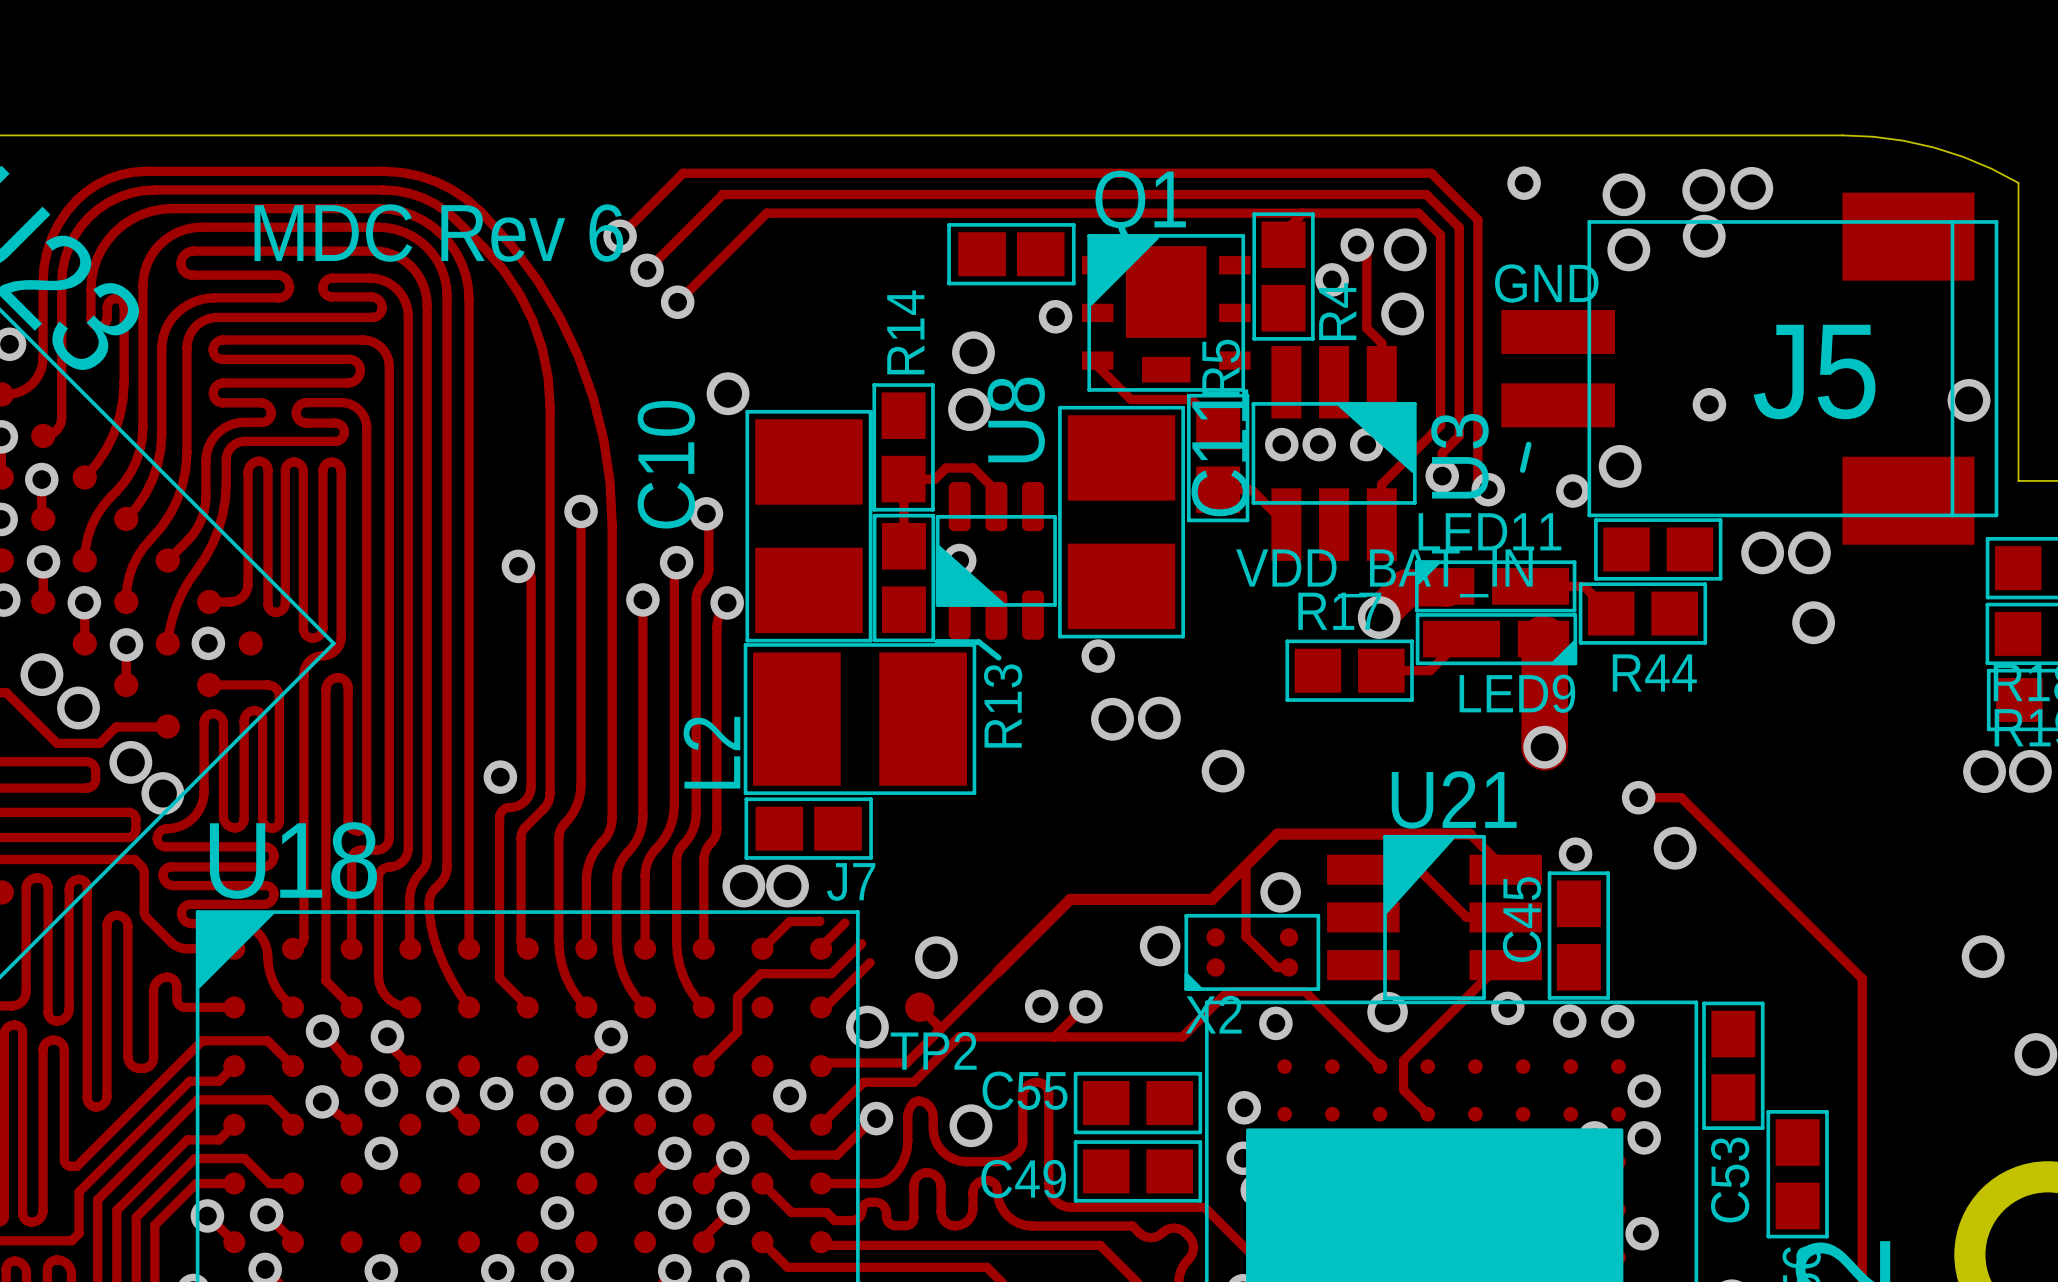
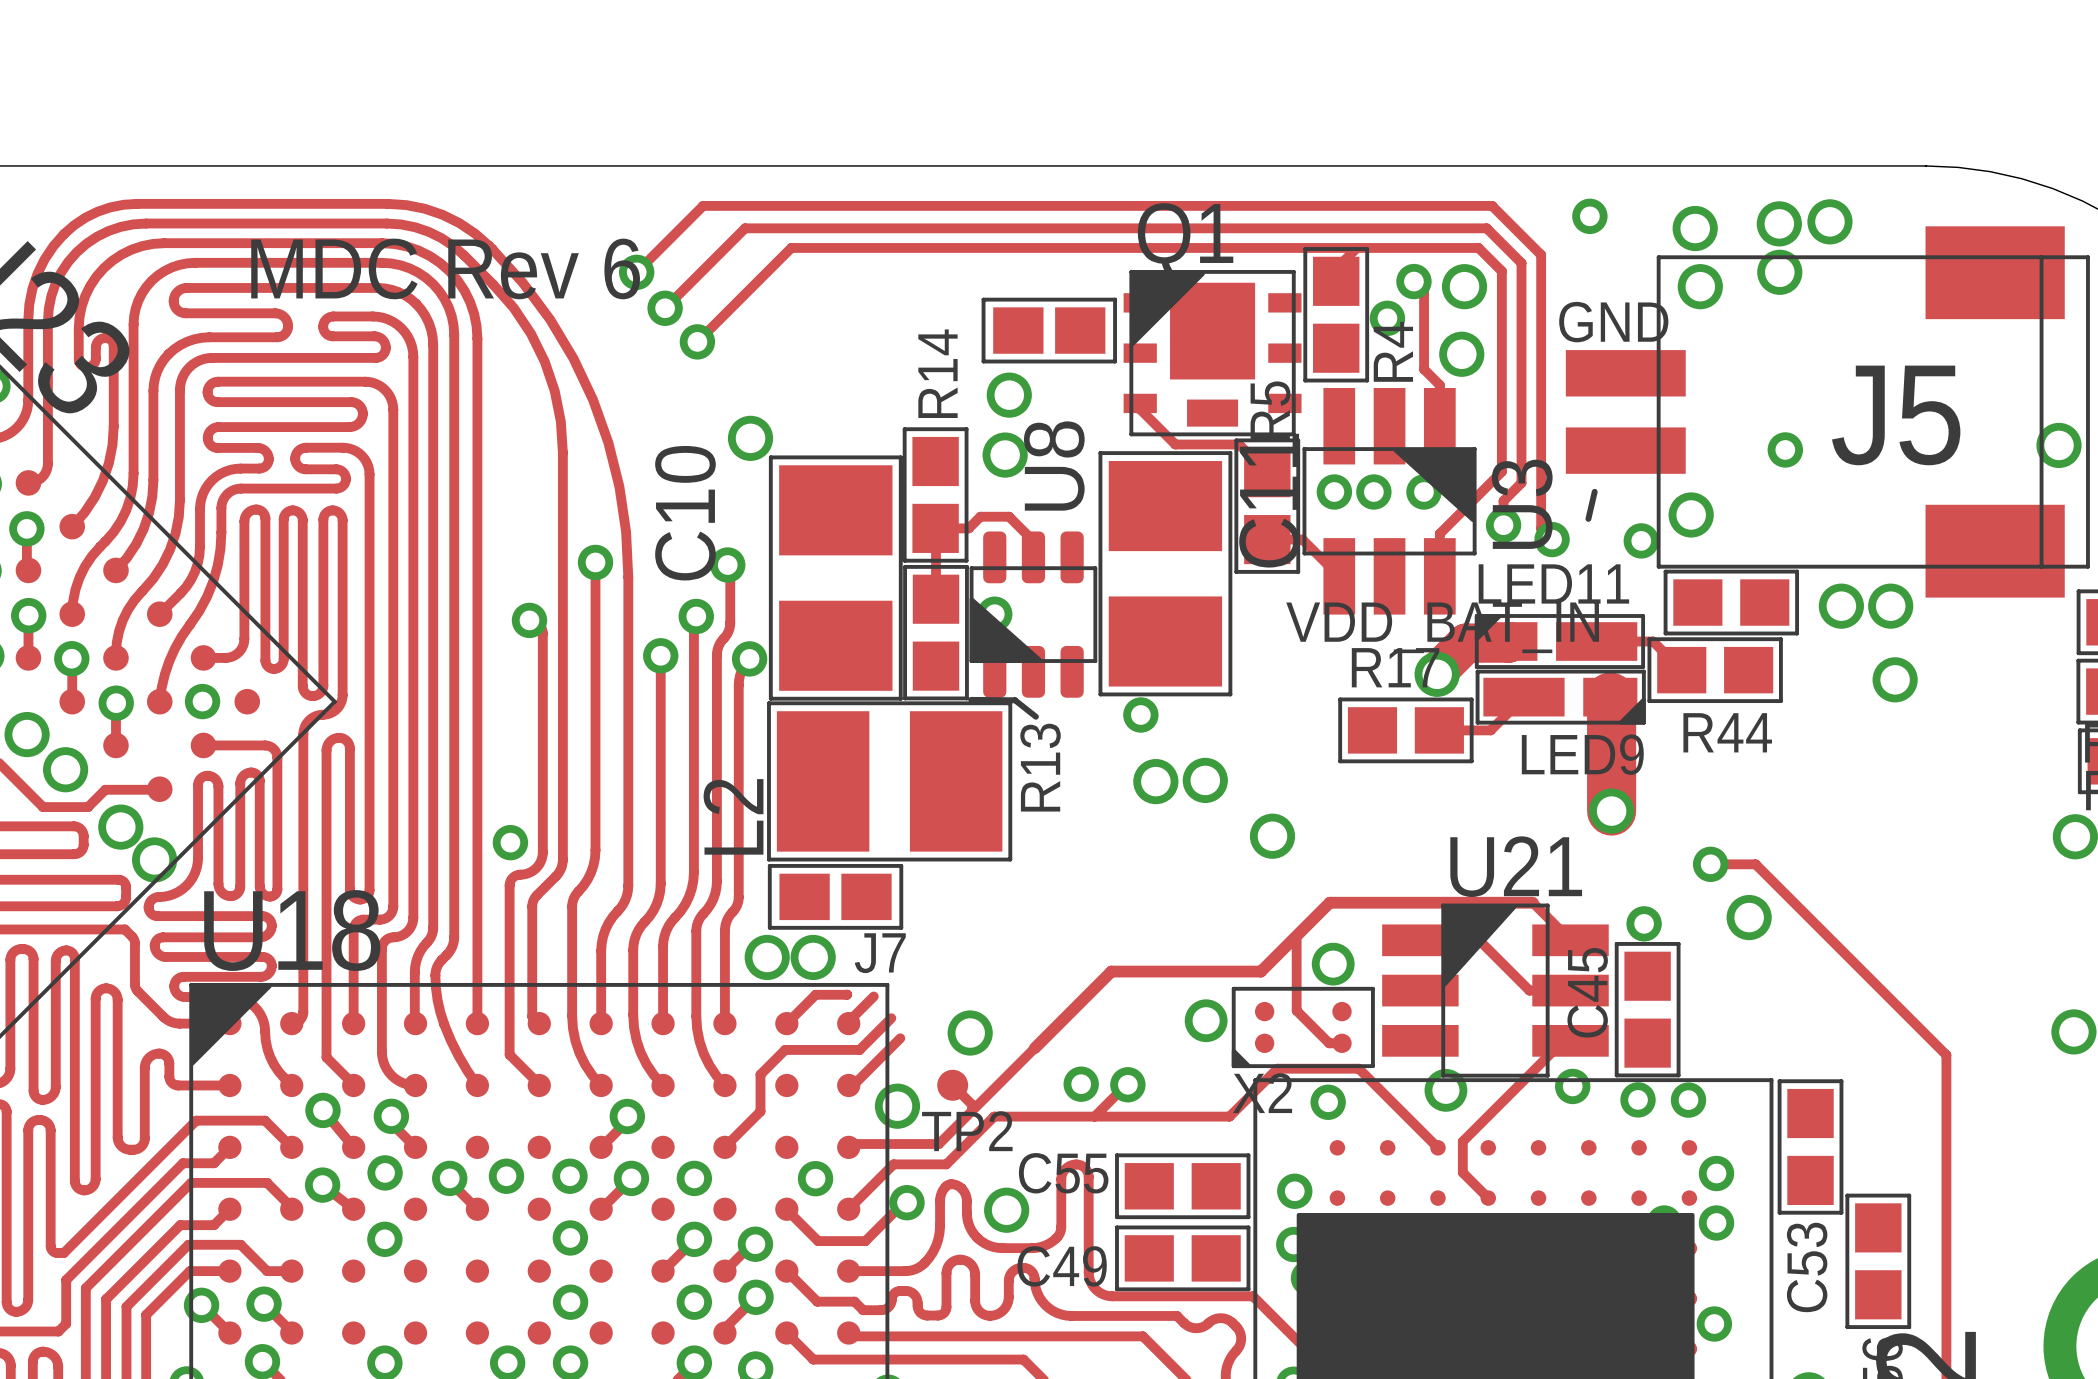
part position: (1011, 254) -> (1049, 330)
via: (1055, 316) -> none

